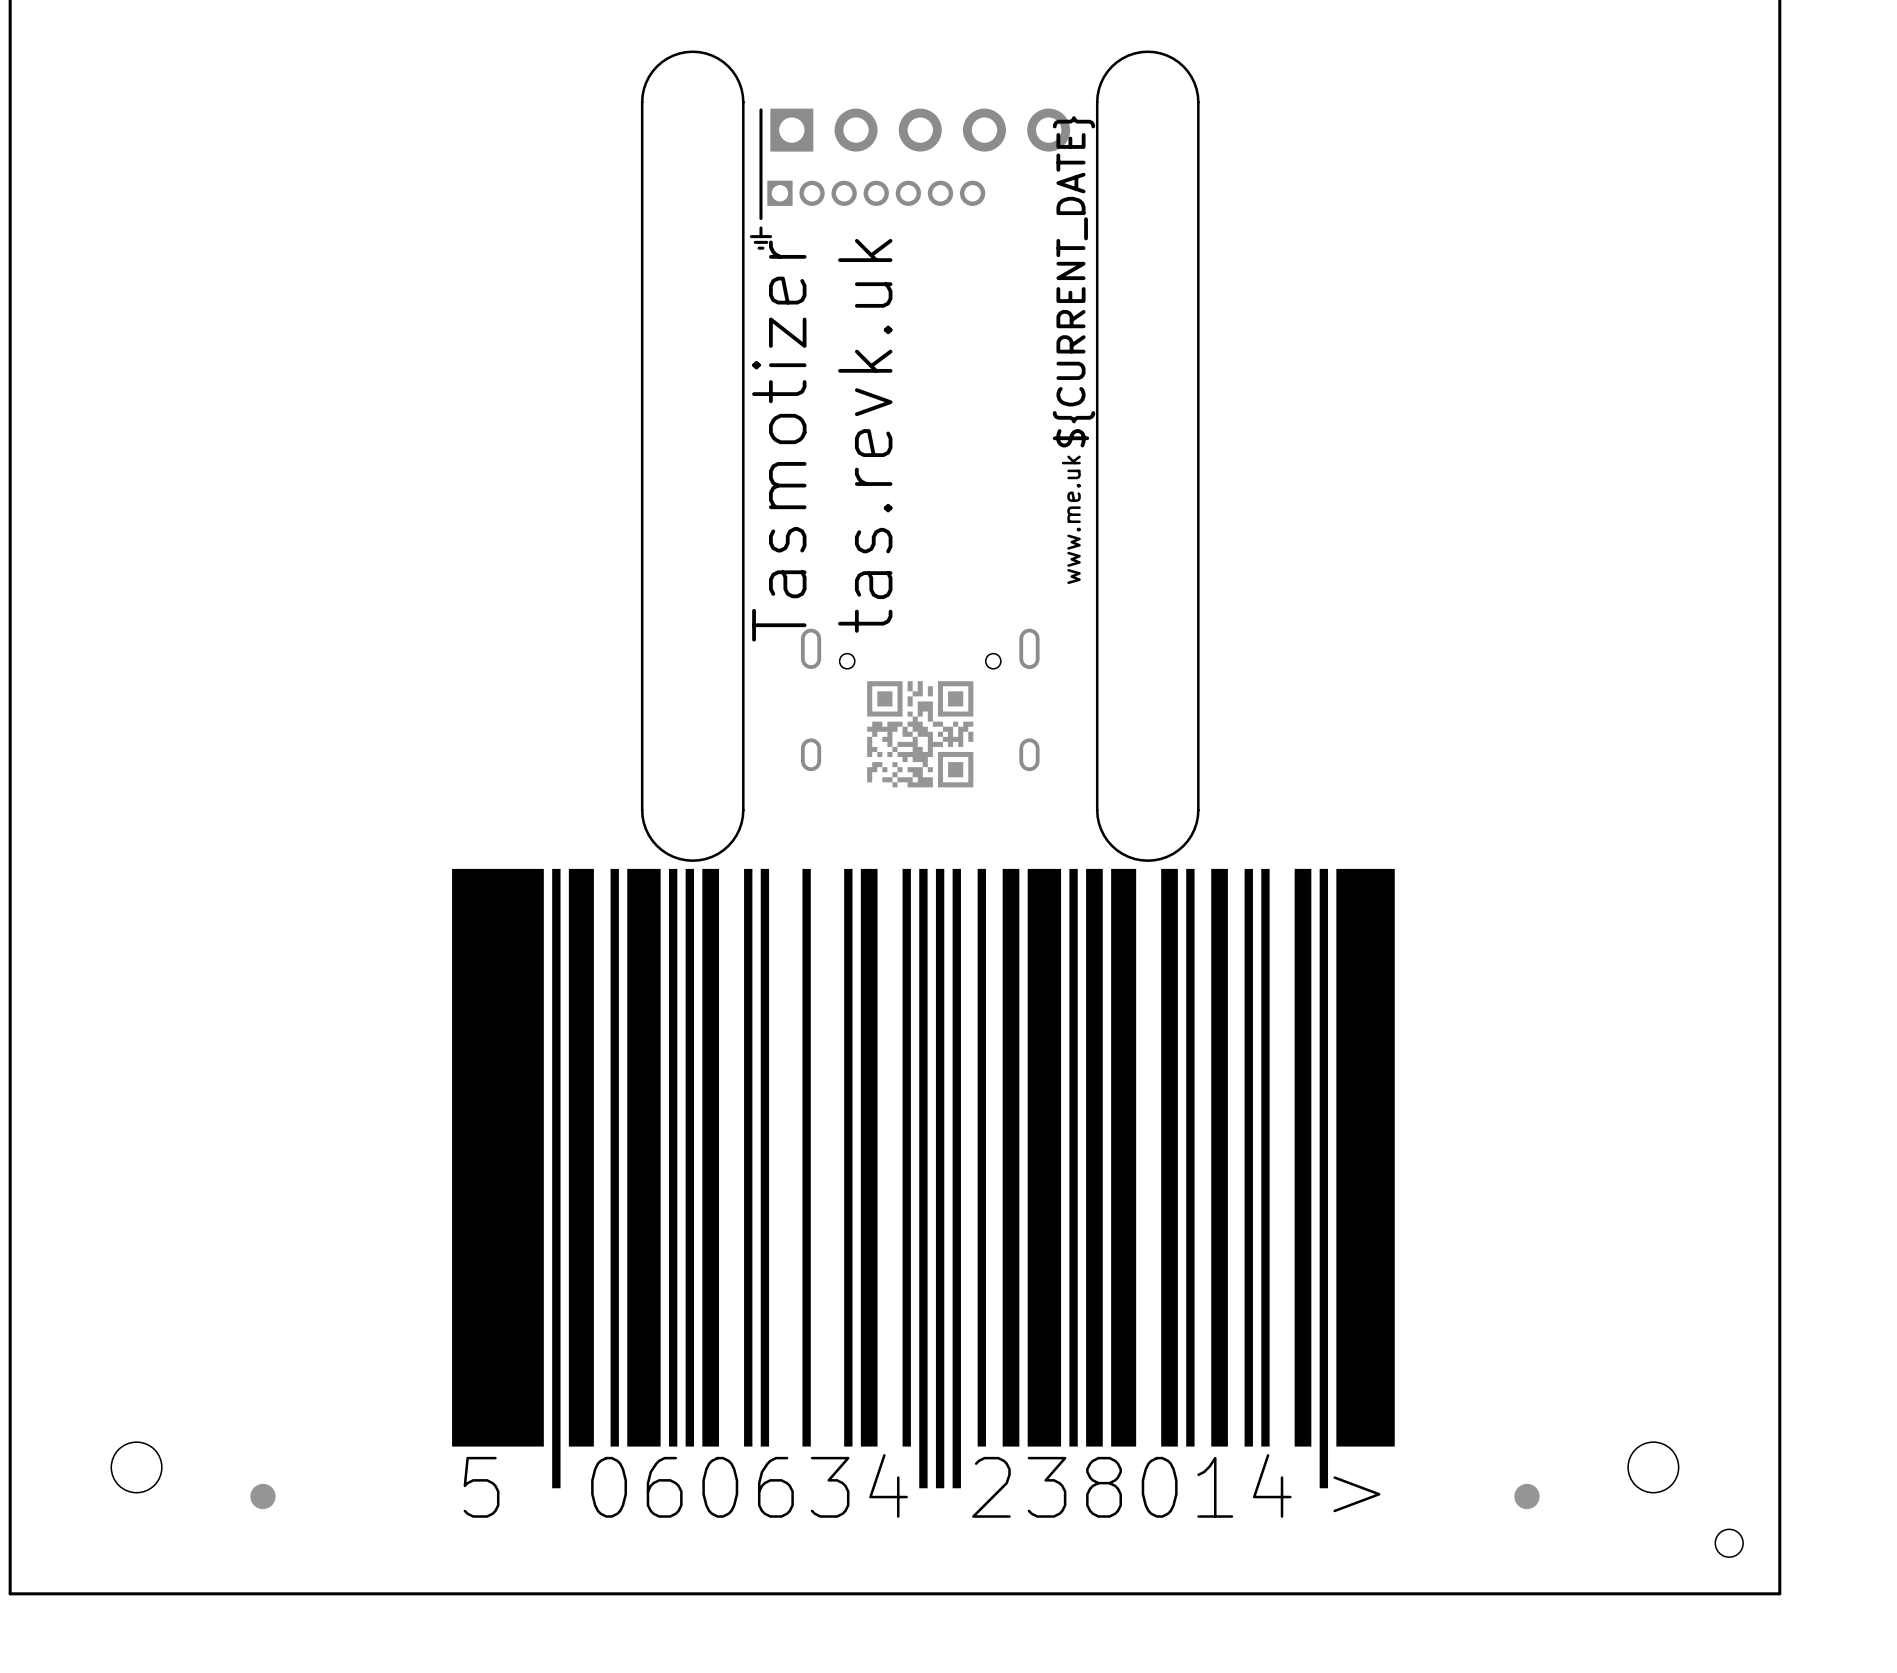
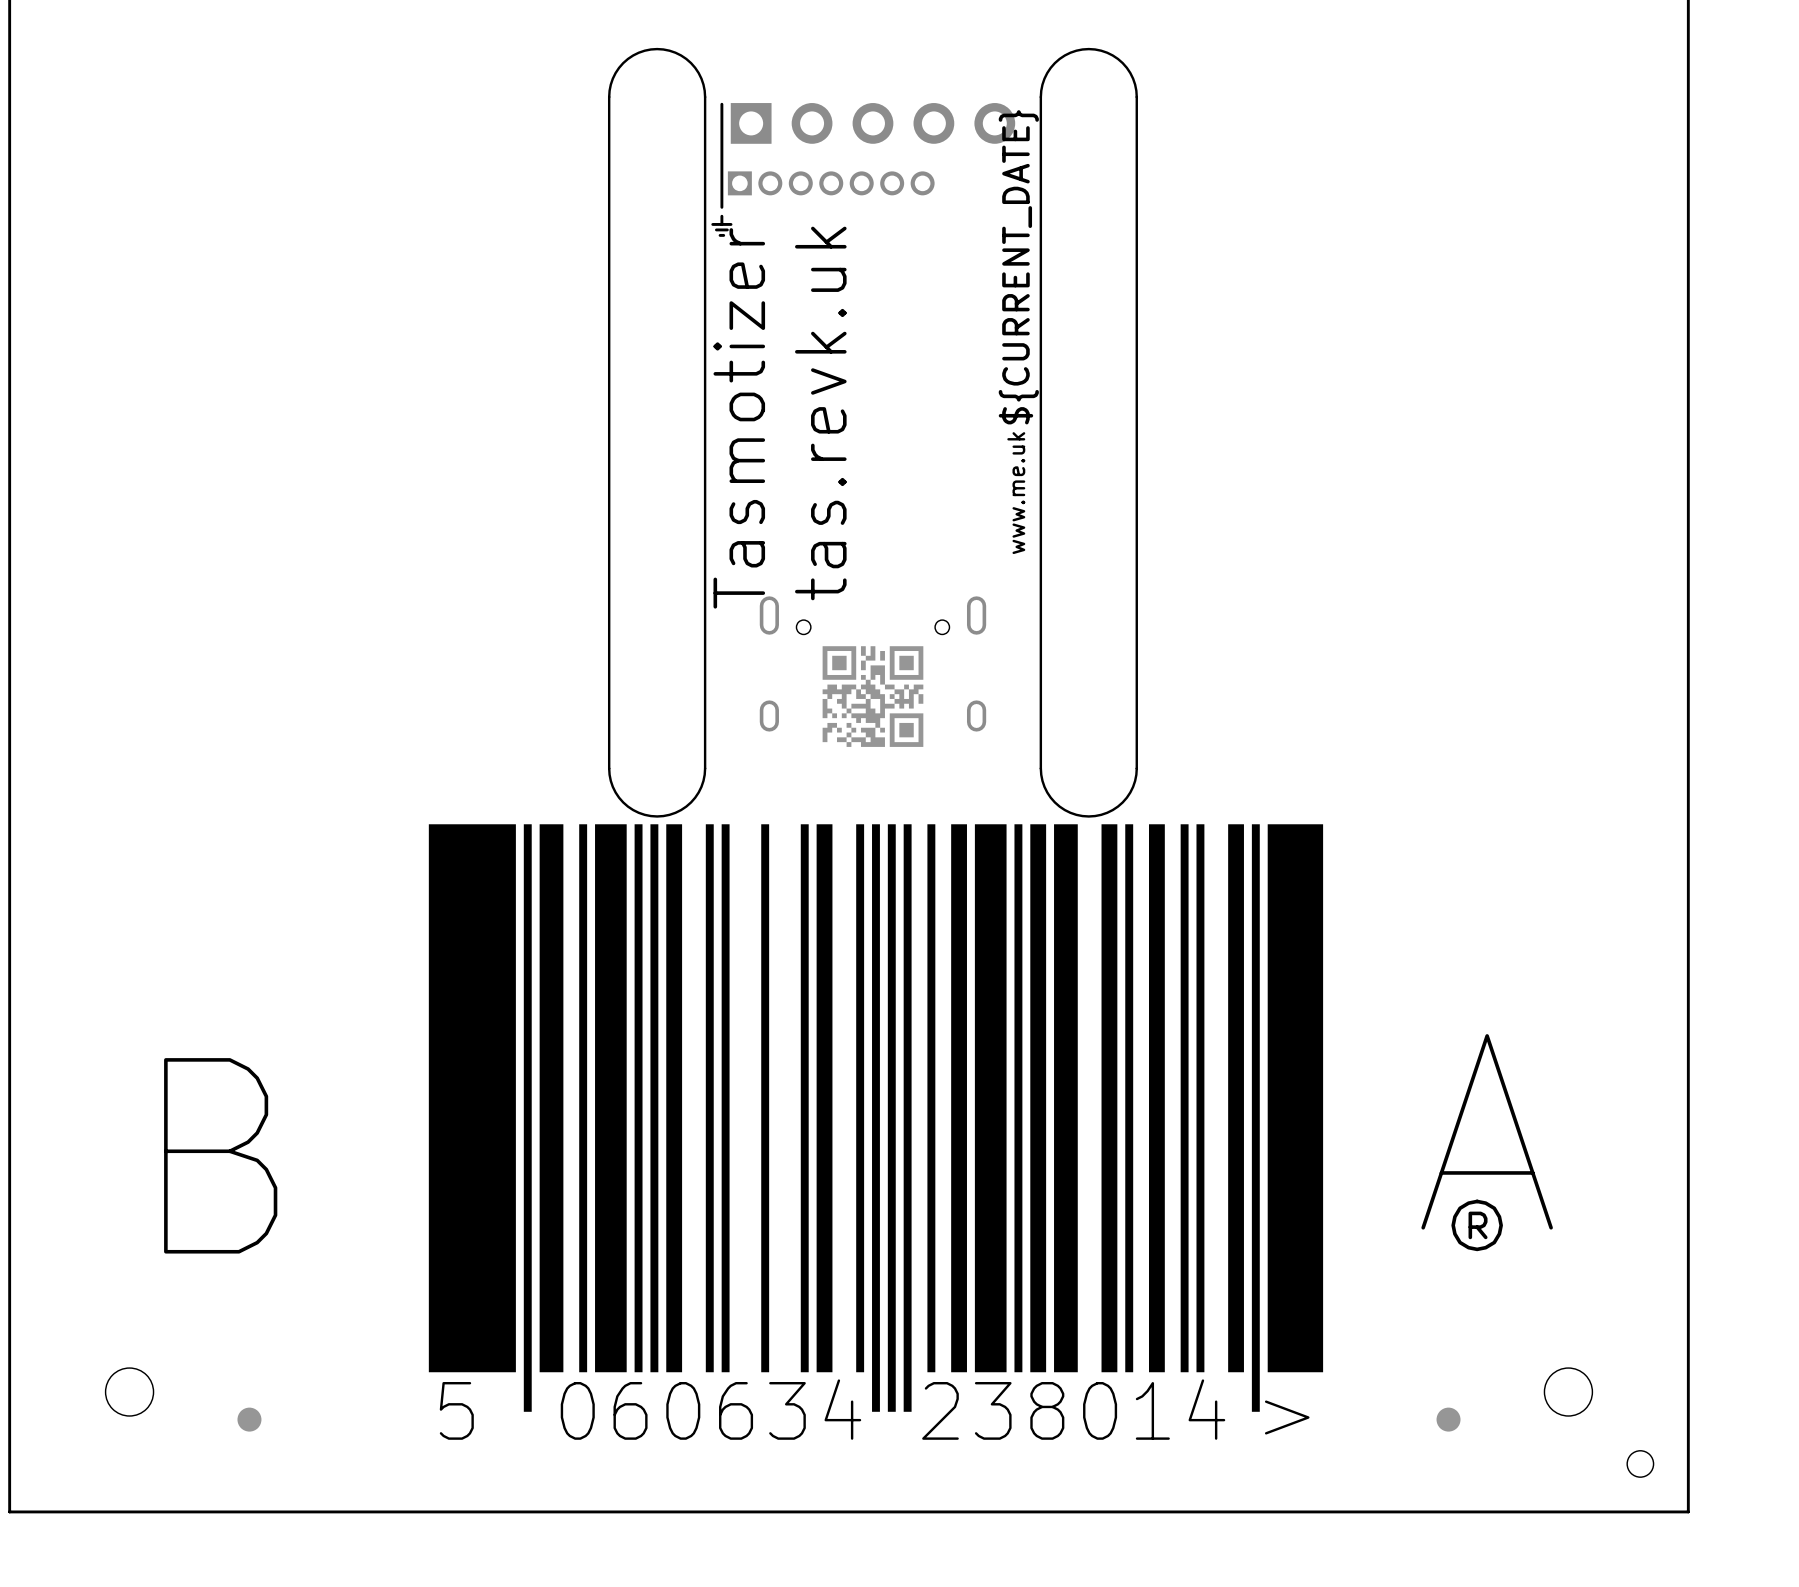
text: none -> A (1487, 1131)
text: none -> B (220, 1155)
text: none -> ® (1477, 1225)

